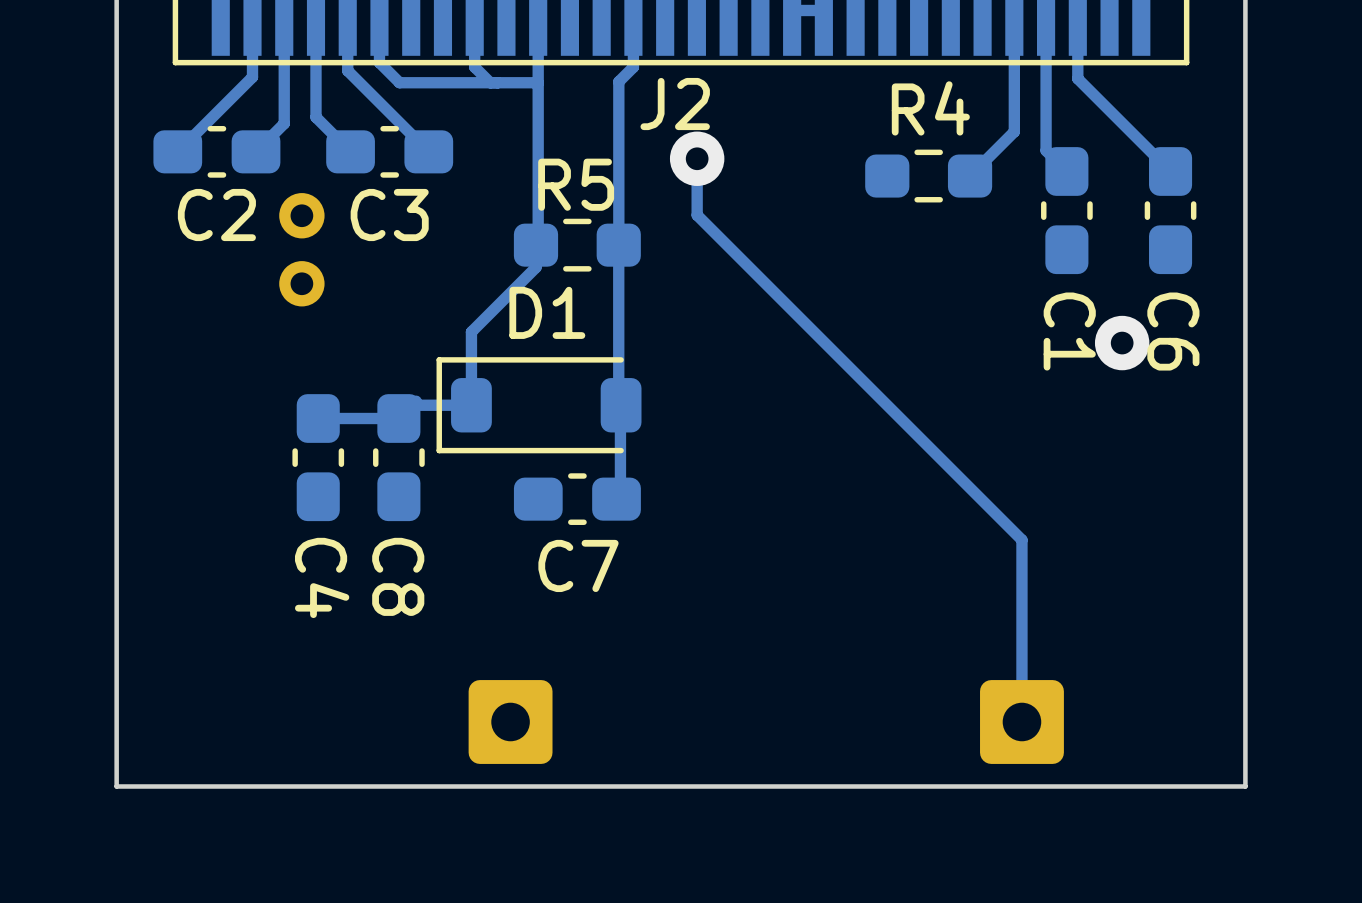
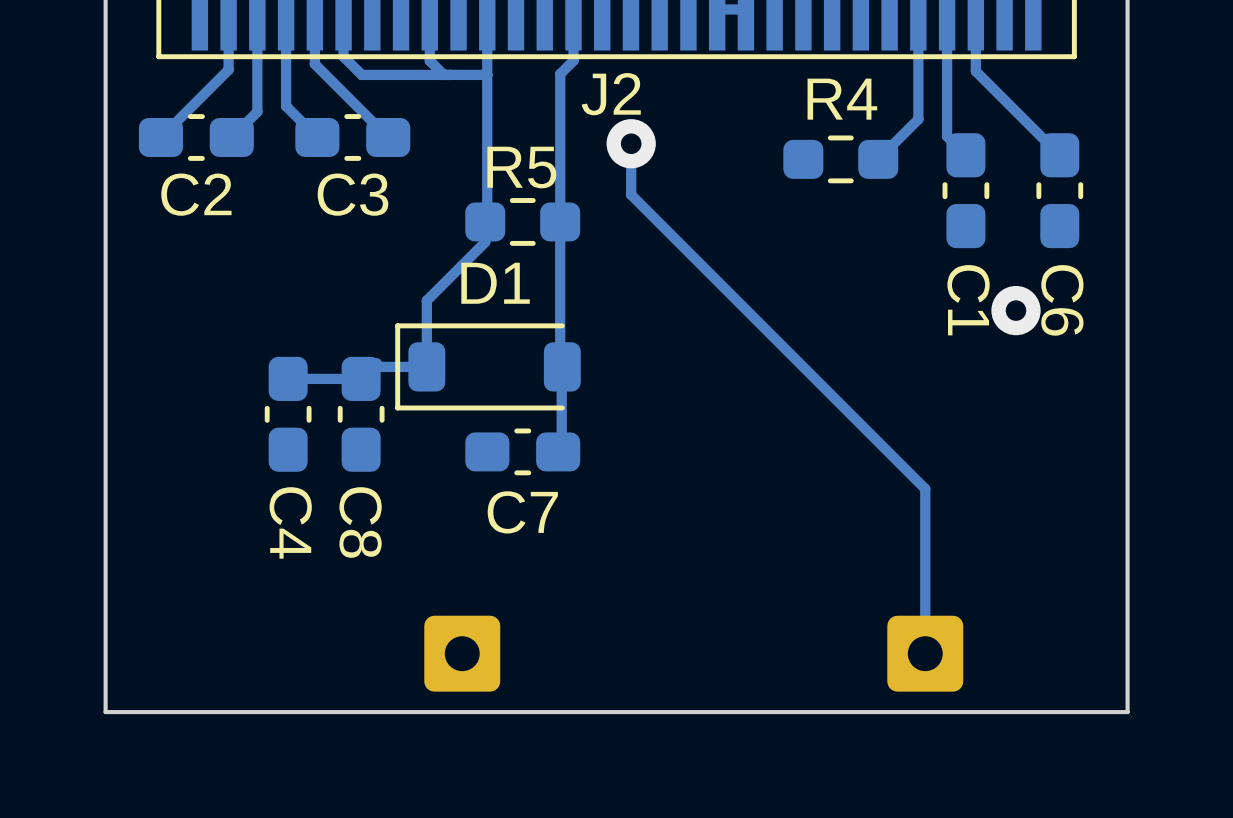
part: (301, 249) -> none

